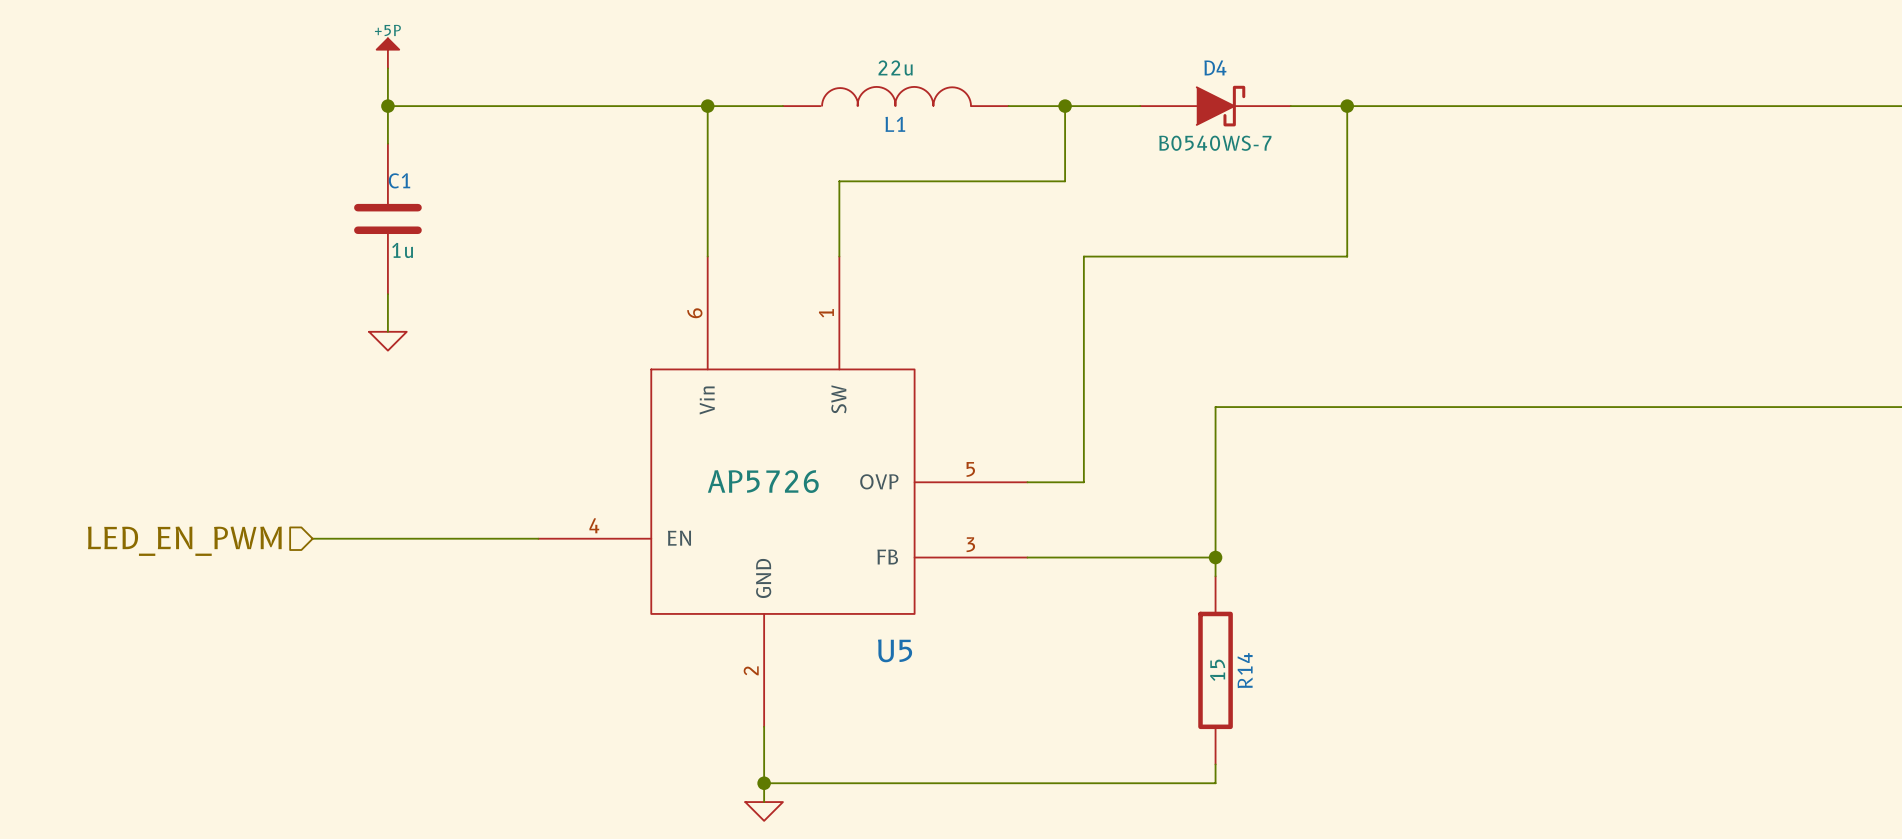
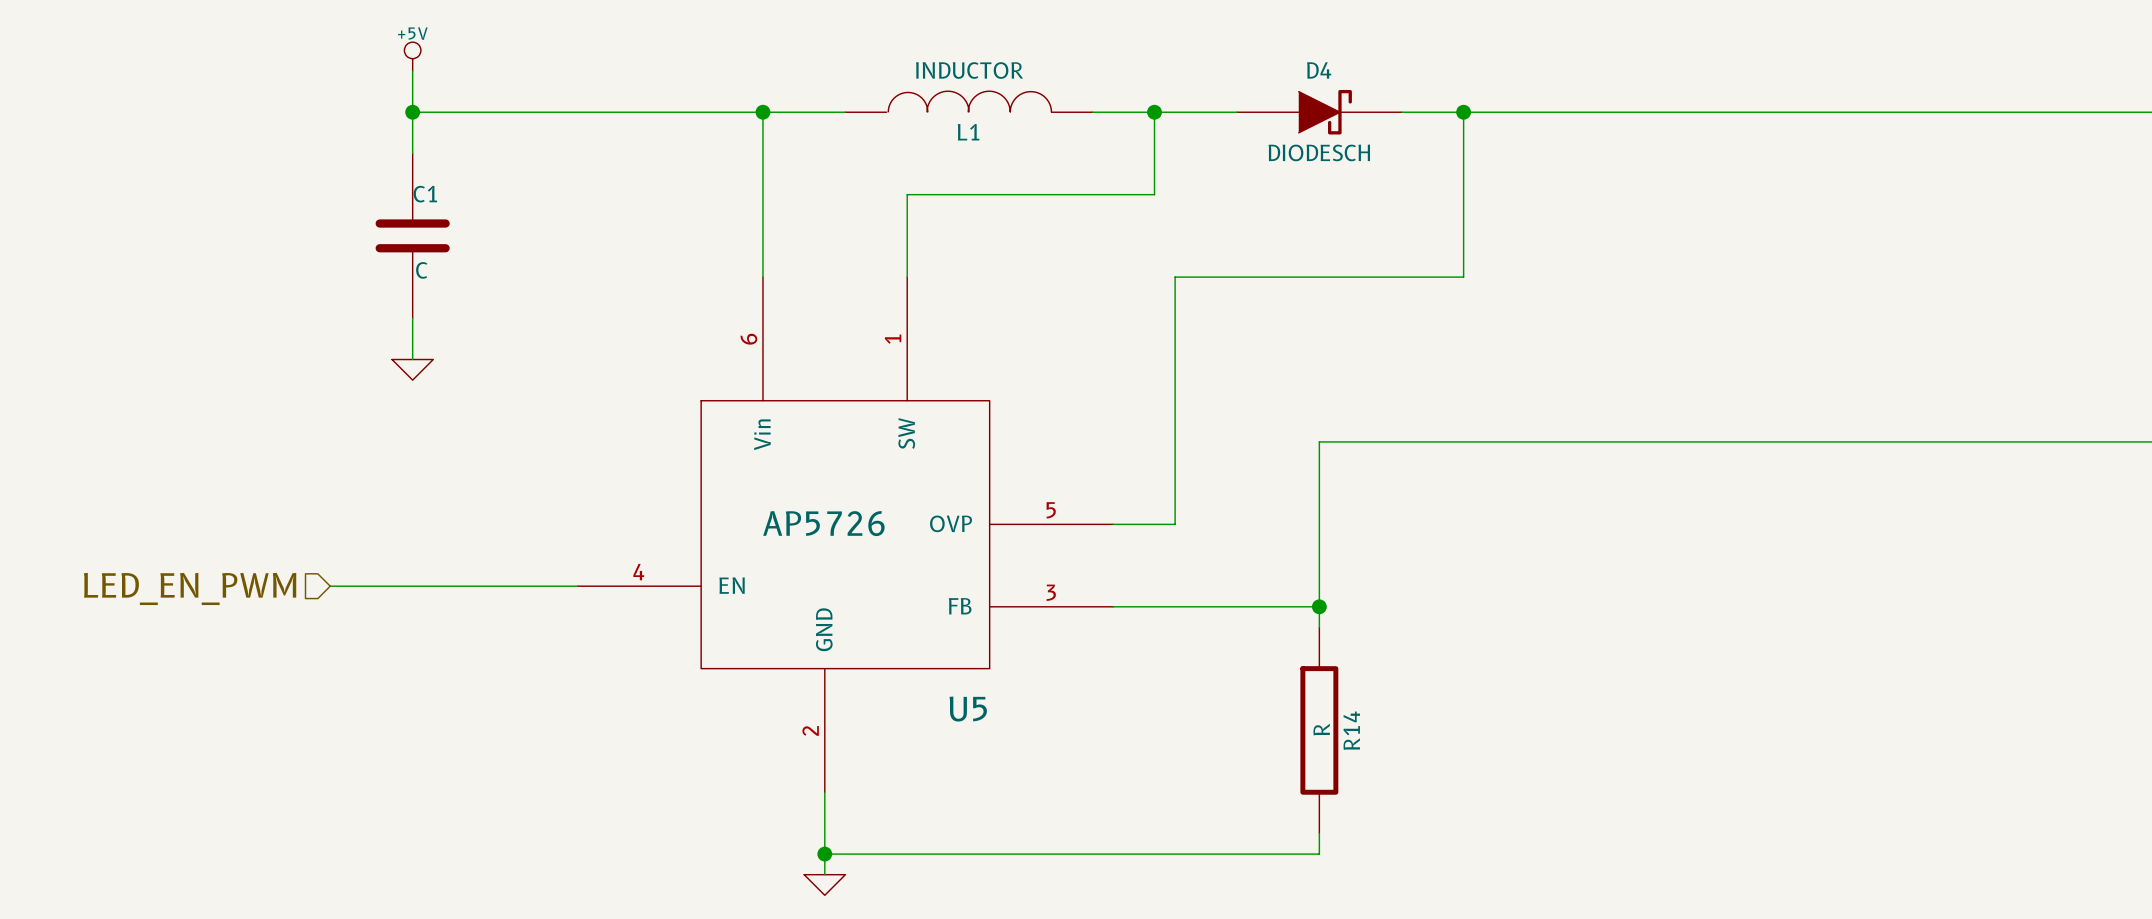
power symbol: +5P (387, 53) -> +5V (412, 56)
L1 value: 22u (895, 68) -> INDUCTOR (969, 70)
D4 value: B0540WS-7 (1215, 143) -> DIODESCH (1319, 152)
C1 value: 1u (402, 250) -> C (421, 270)
R14 value: 15 (1217, 670) -> R (1321, 729)

